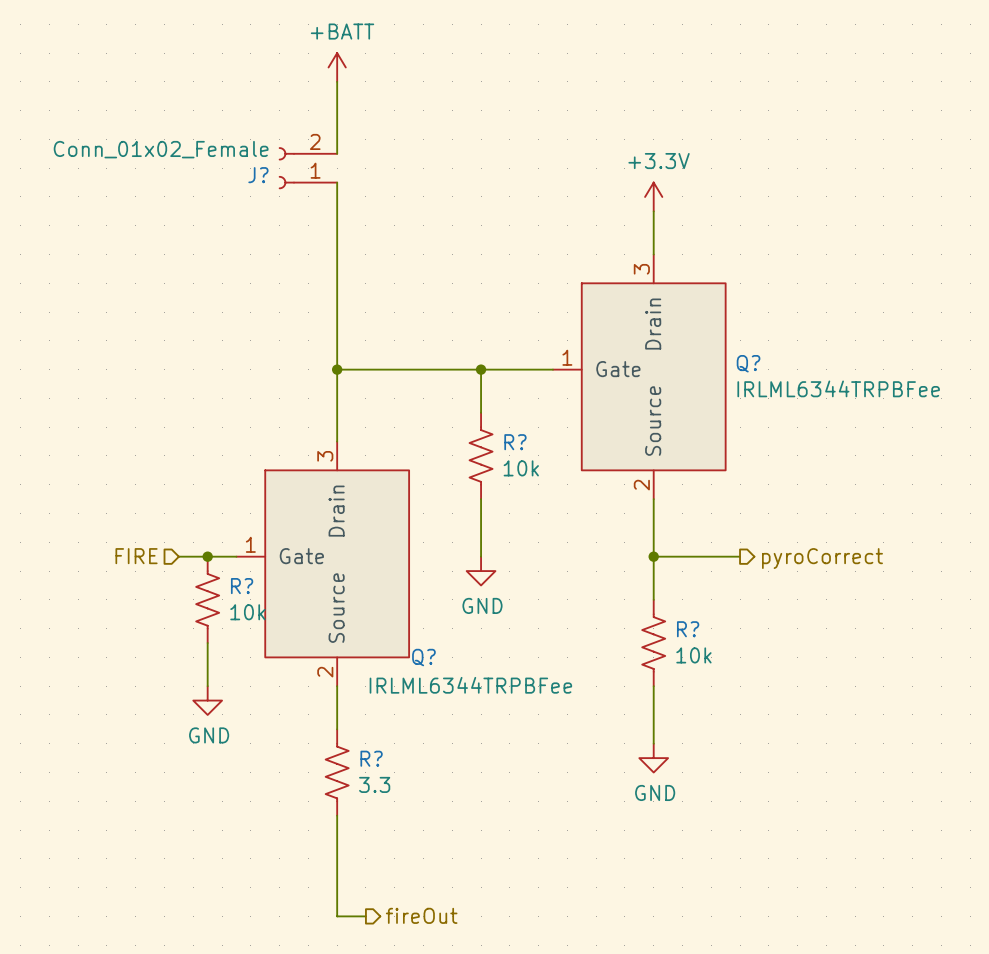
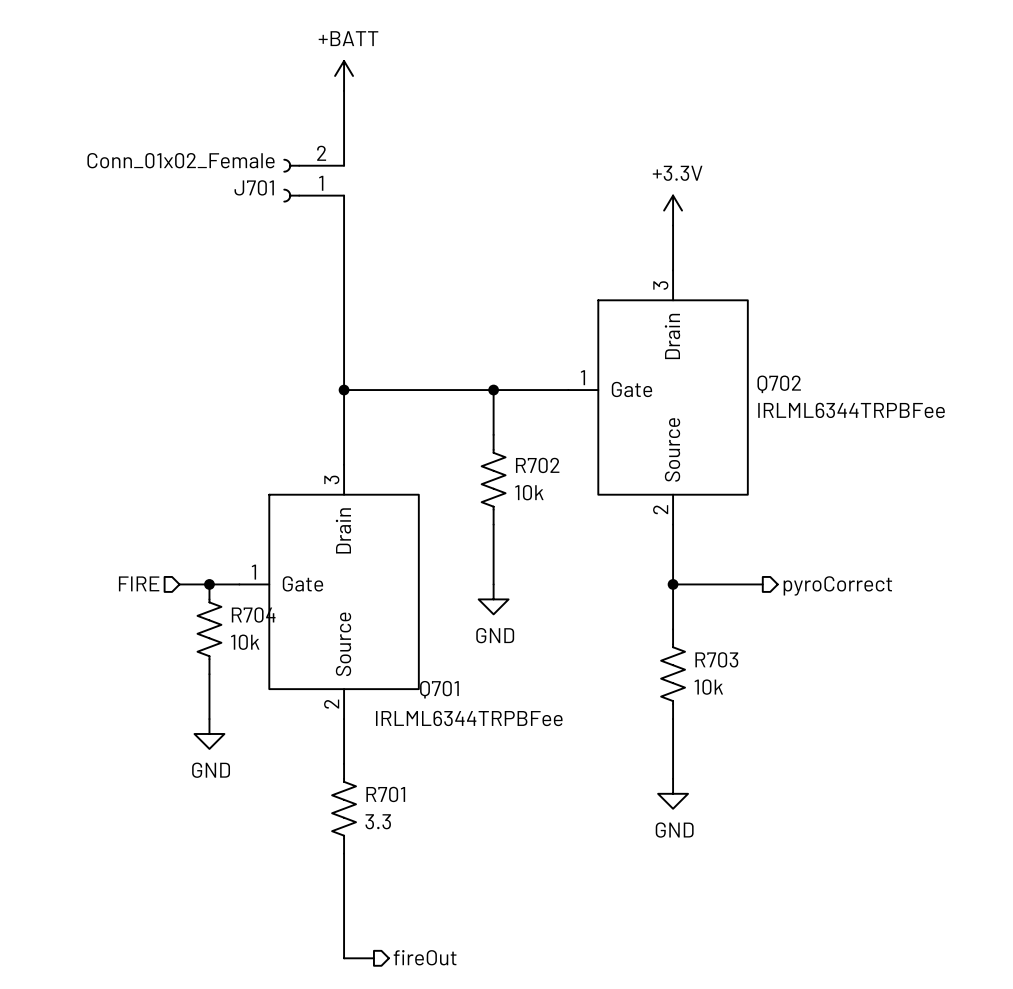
J? name: J? (258, 175) -> J701 (254, 187)
Q? name: Q? (748, 363) -> Q702 (779, 384)
R? name: R? (515, 442) -> R702 (537, 465)
R? name: R? (242, 586) -> R704 (253, 615)
R? name: R? (688, 629) -> R703 (716, 659)
Q? name: Q? (423, 657) -> Q701 (439, 689)
R? name: R? (371, 758) -> R701 (385, 794)

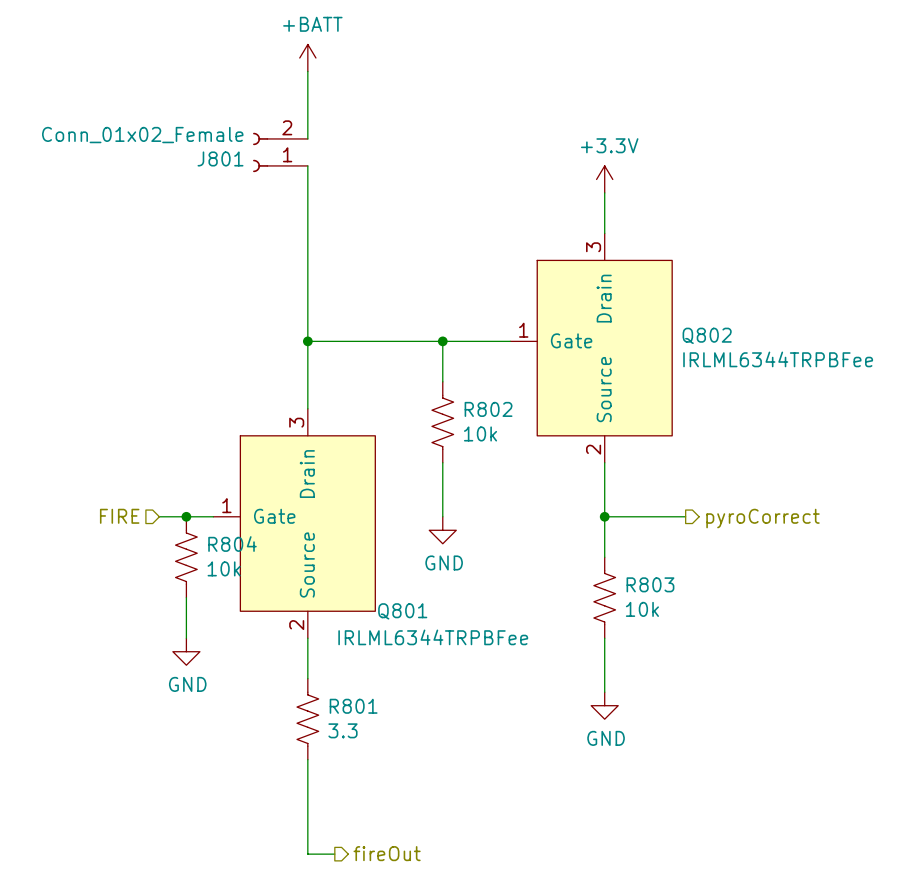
J701 name: J701 (254, 187) -> J801 (220, 158)
Q702 name: Q702 (779, 384) -> Q802 (707, 335)
R702 name: R702 (537, 465) -> R802 (488, 409)
R704 name: R704 (253, 615) -> R804 (232, 544)
R703 name: R703 (716, 659) -> R803 (650, 584)
Q701 name: Q701 (439, 689) -> Q801 (402, 611)
R701 name: R701 (385, 794) -> R801 (353, 706)

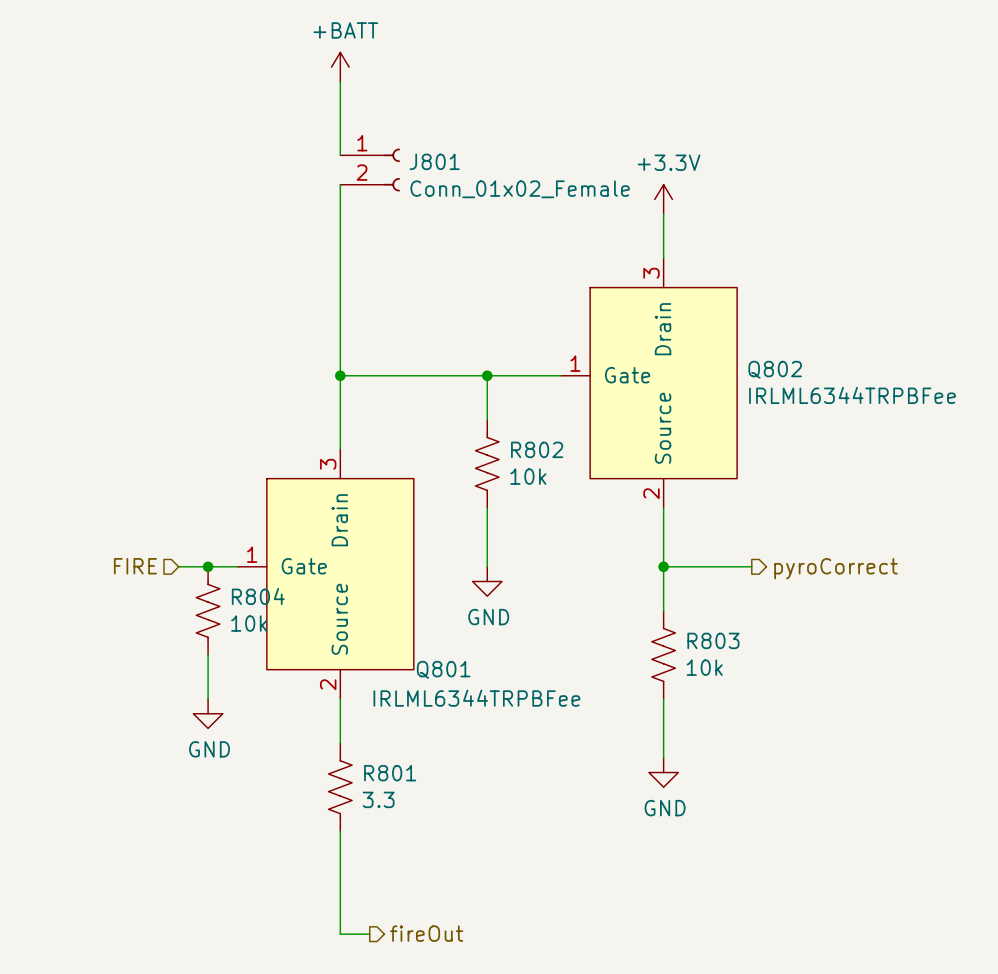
J801 rotation: 0° (260, 152) -> 180° (391, 170)
J801 position: (280, 152) -> (370, 170)

